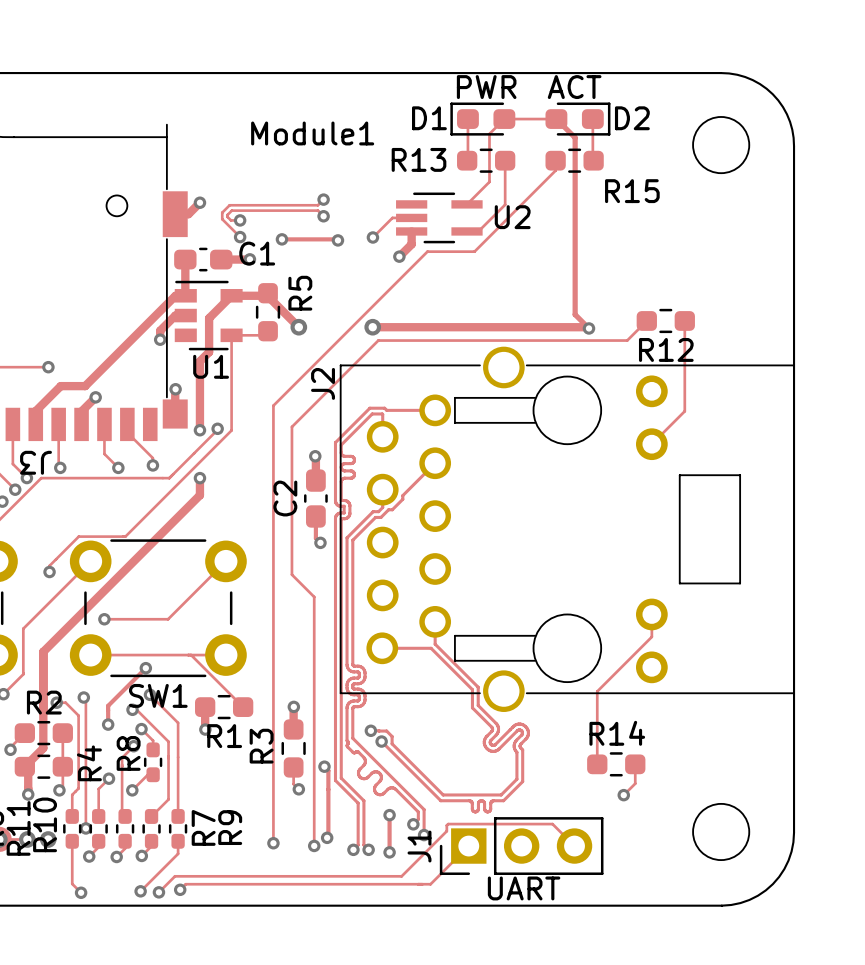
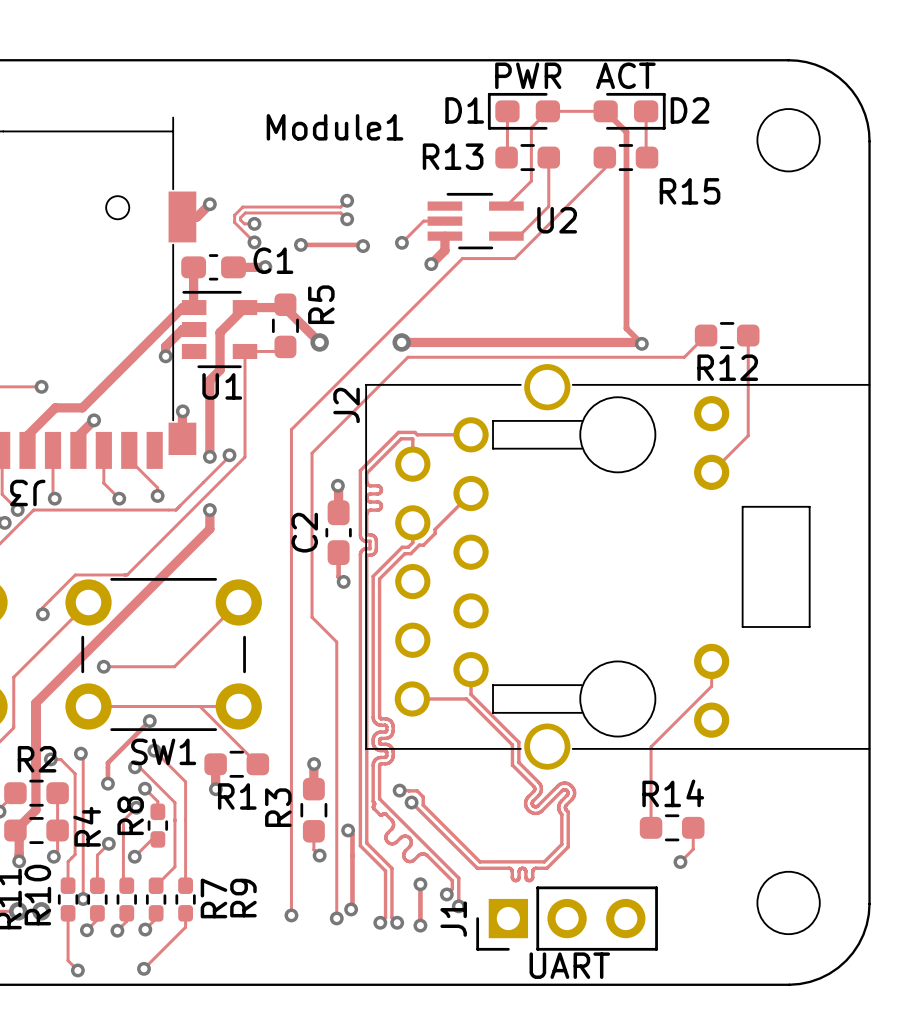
track: (468, 846) (430, 884) (185, 884) (180, 889) -> none
track: (574, 846) (552, 824) (448, 824) (446, 831) (401, 876) (174, 876) (158, 892) -> none
via: (180, 889) -> none
via: (158, 892) -> none

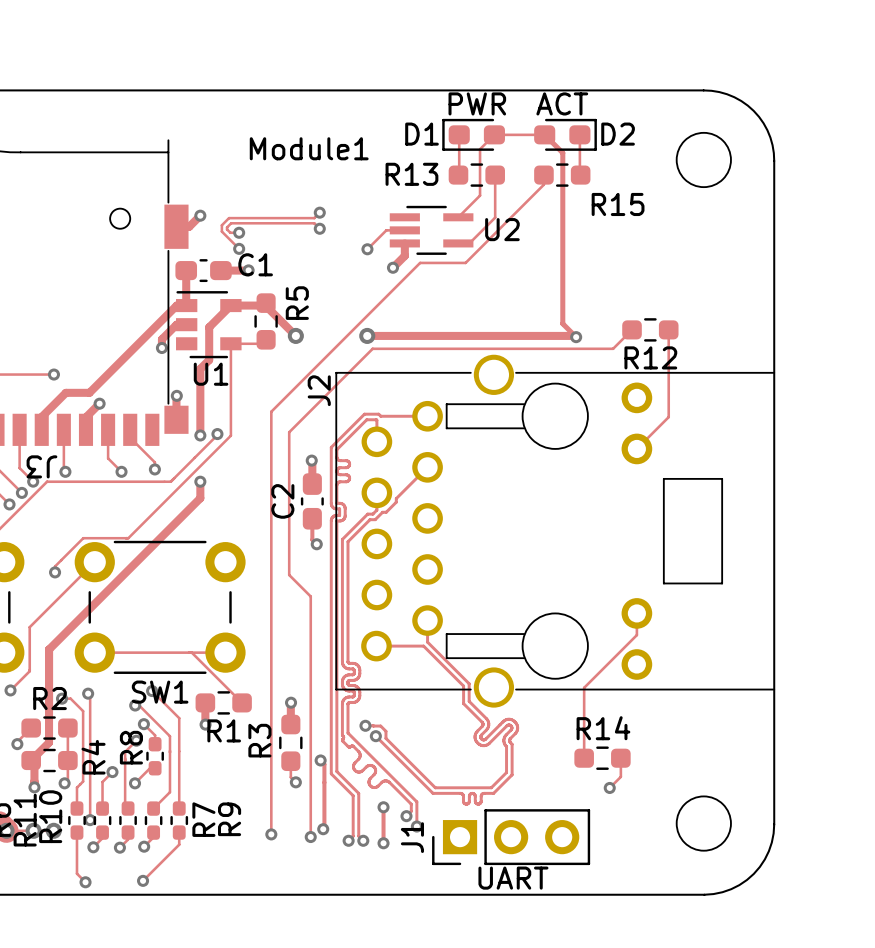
track: (300, 244) (363, 246) -> none
via: (300, 244) -> none
via: (363, 246) -> none
track: (238, 602) (174, 666) (103, 666) -> none
via: (103, 666) -> none
track: (149, 721) (107, 762) (107, 783) -> none
via: (149, 721) -> none
via: (107, 783) -> none

